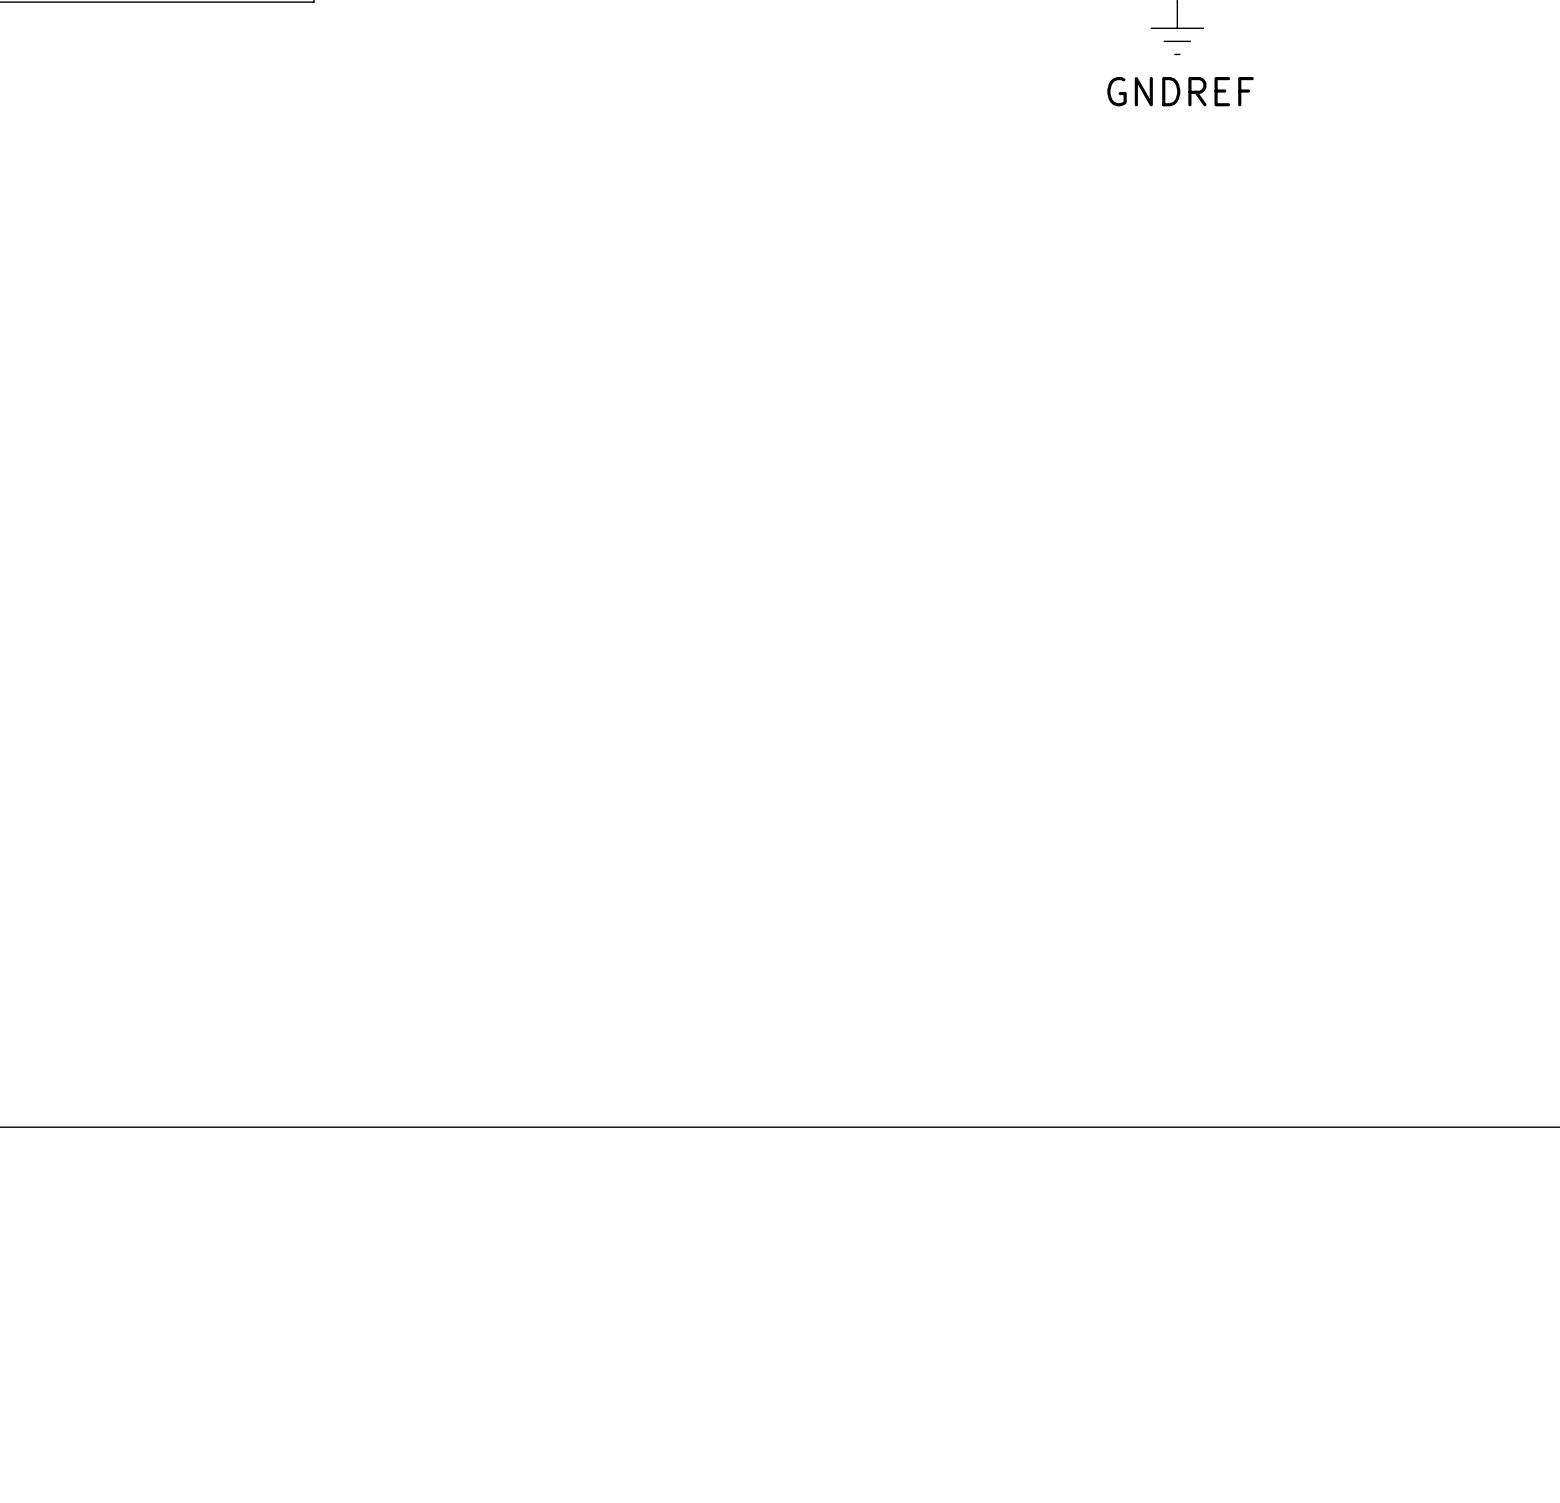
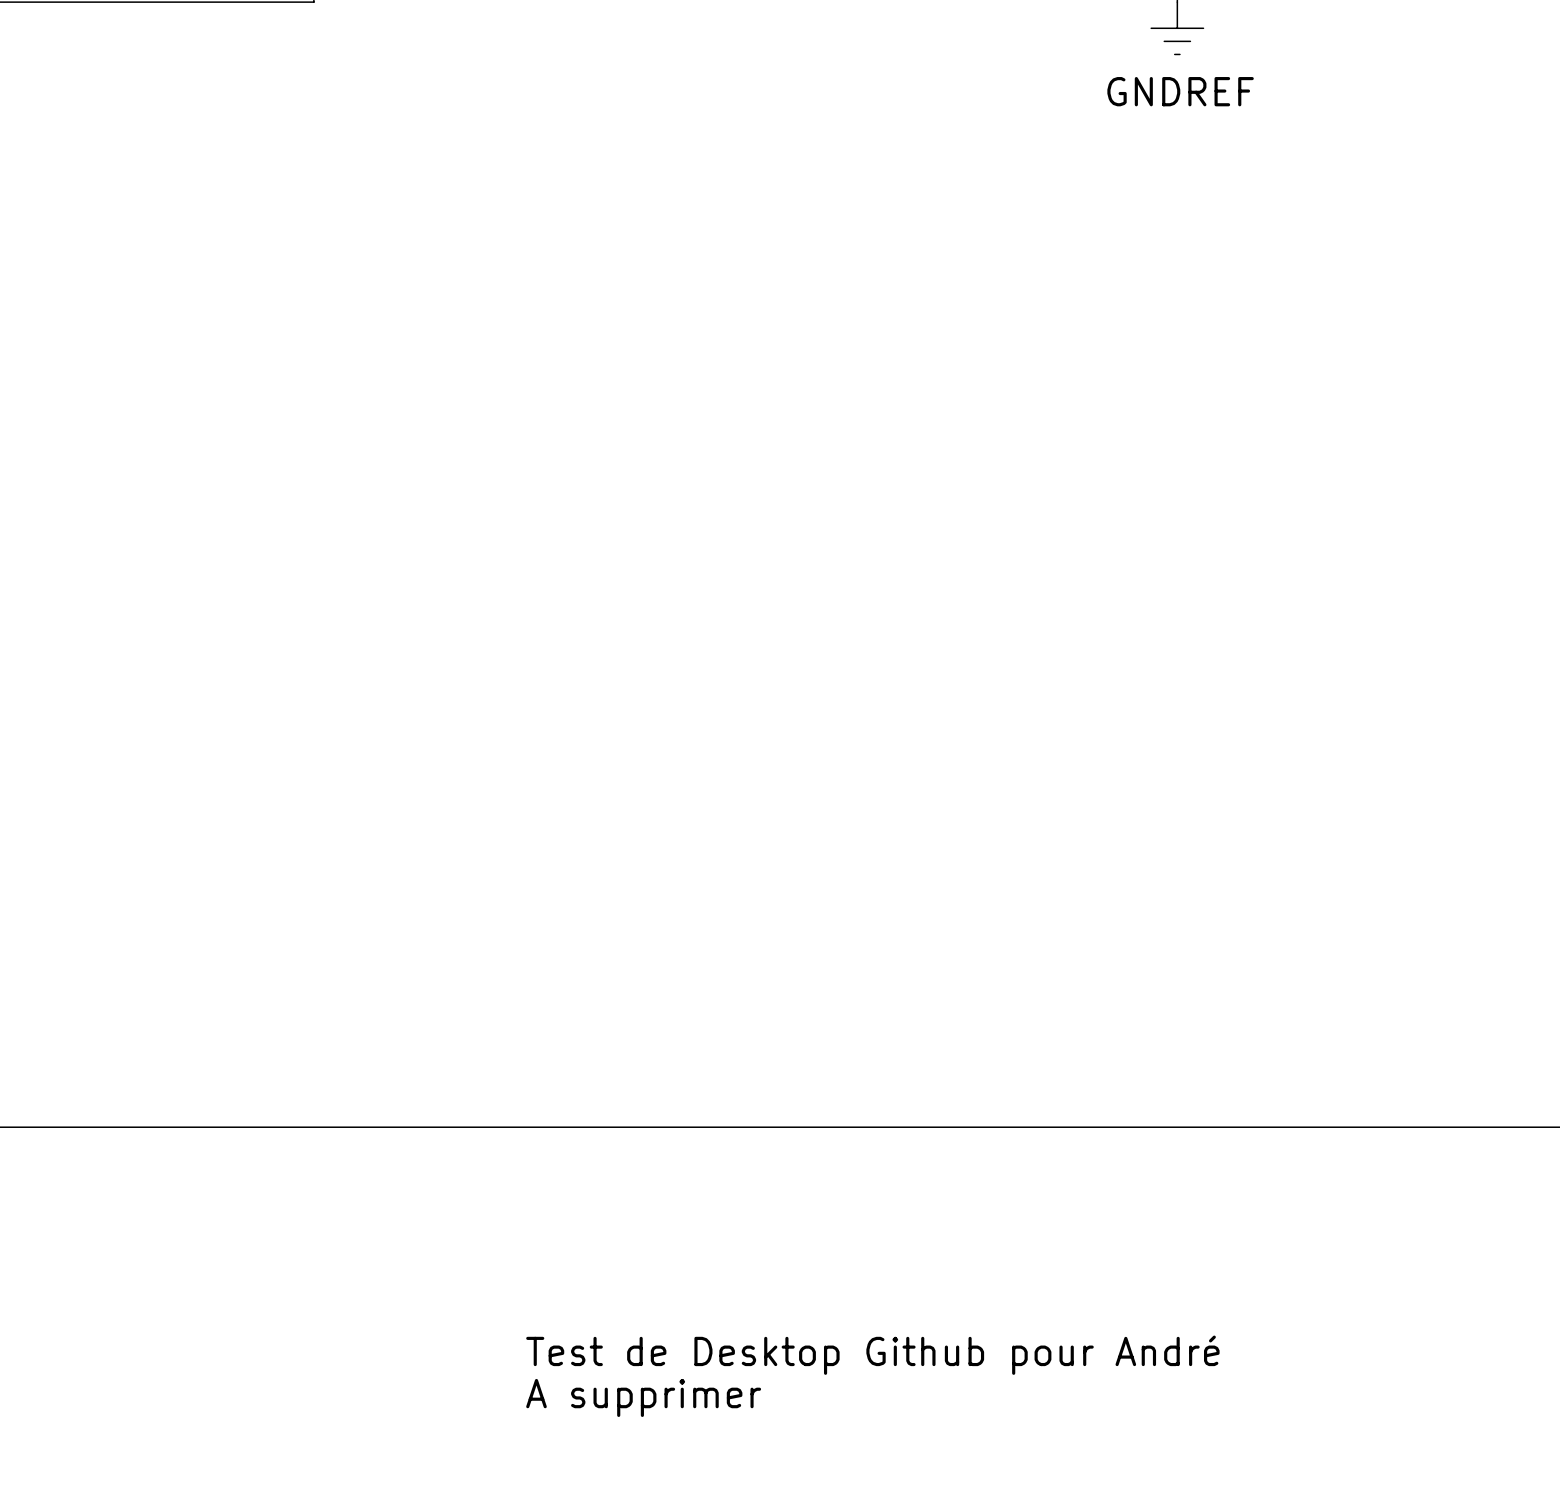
text: none -> Test de Desktop Github pour André (872, 1355)
text: none -> A supprimer (643, 1397)

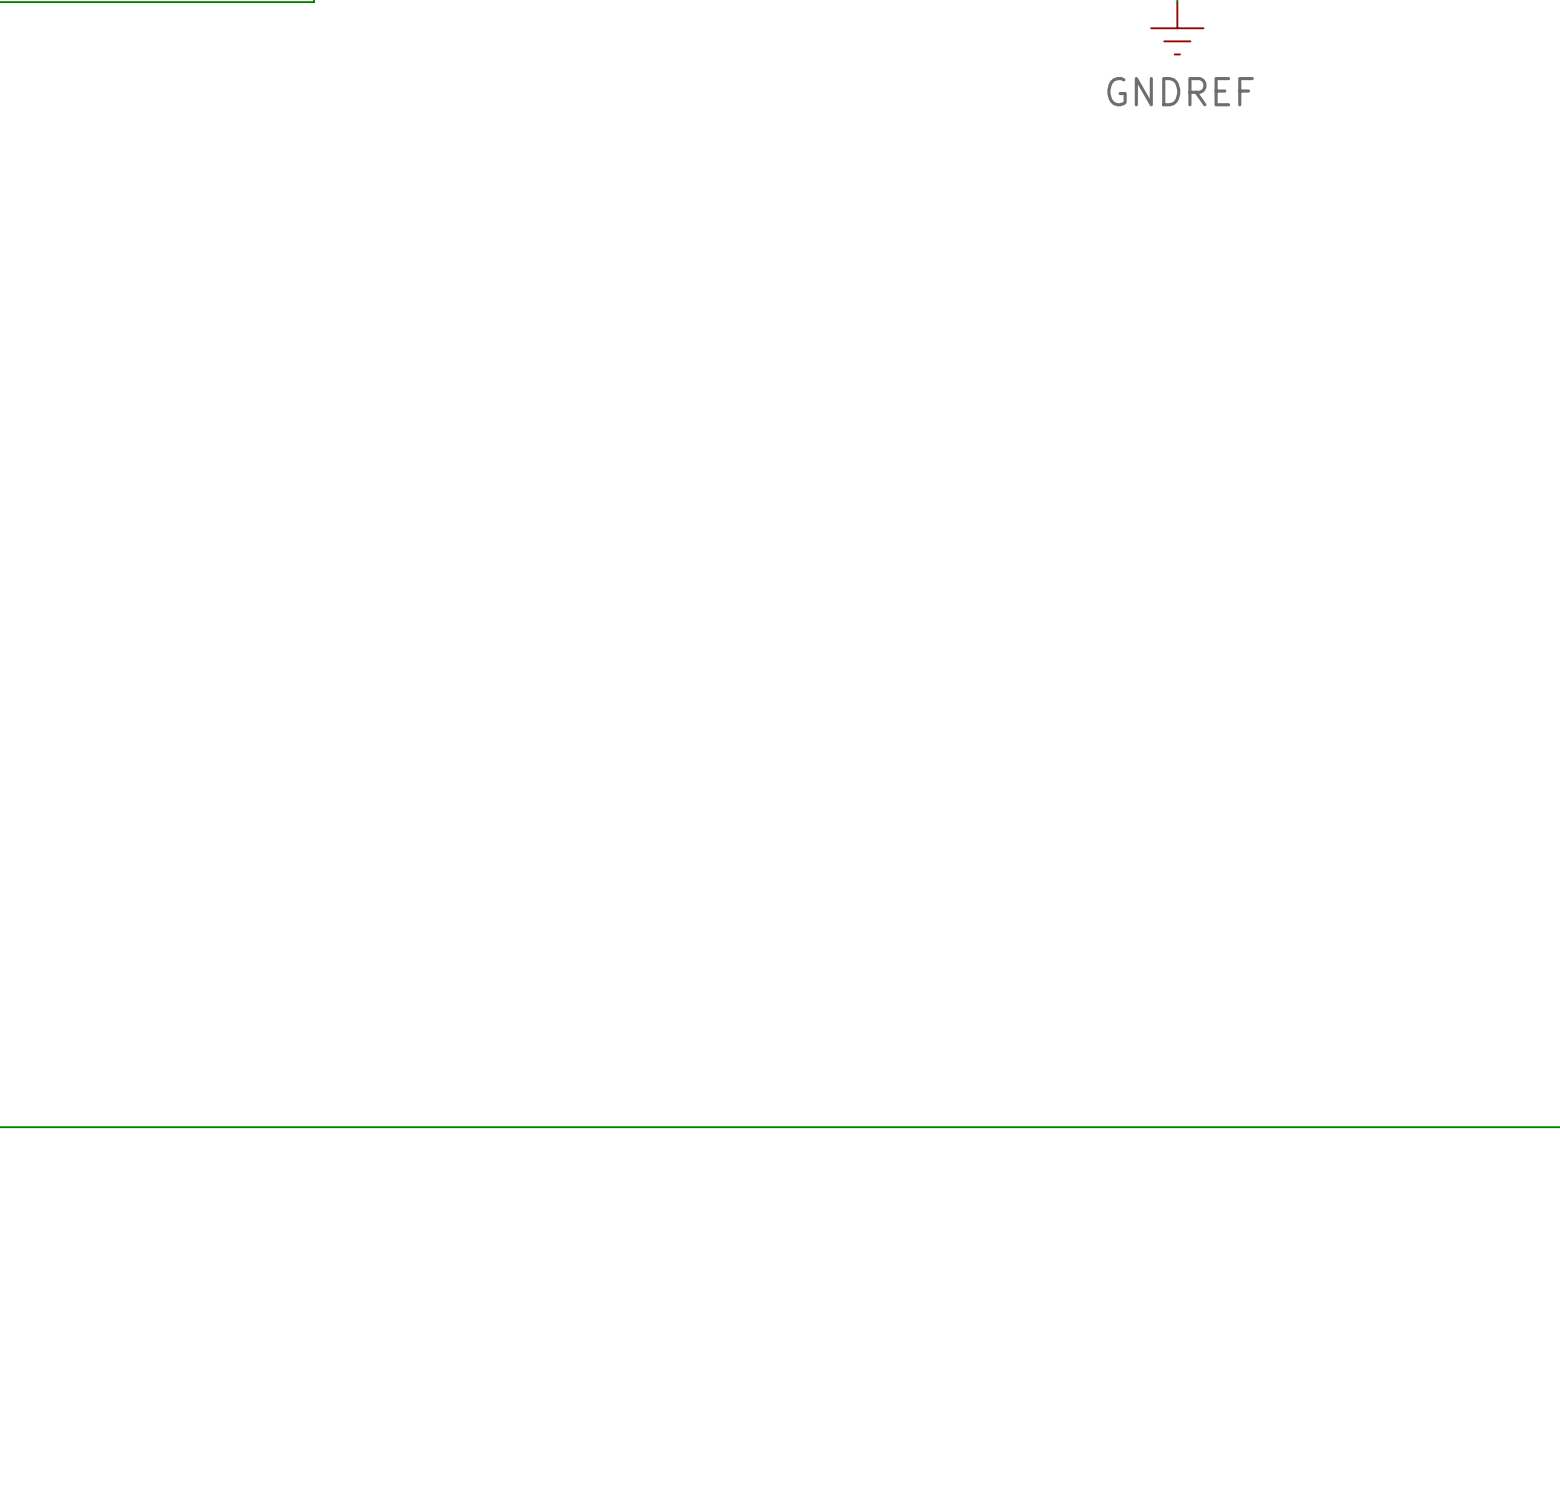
text: Test de Desktop Github pour André (872, 1355) -> none
text: A supprimer (643, 1397) -> none

